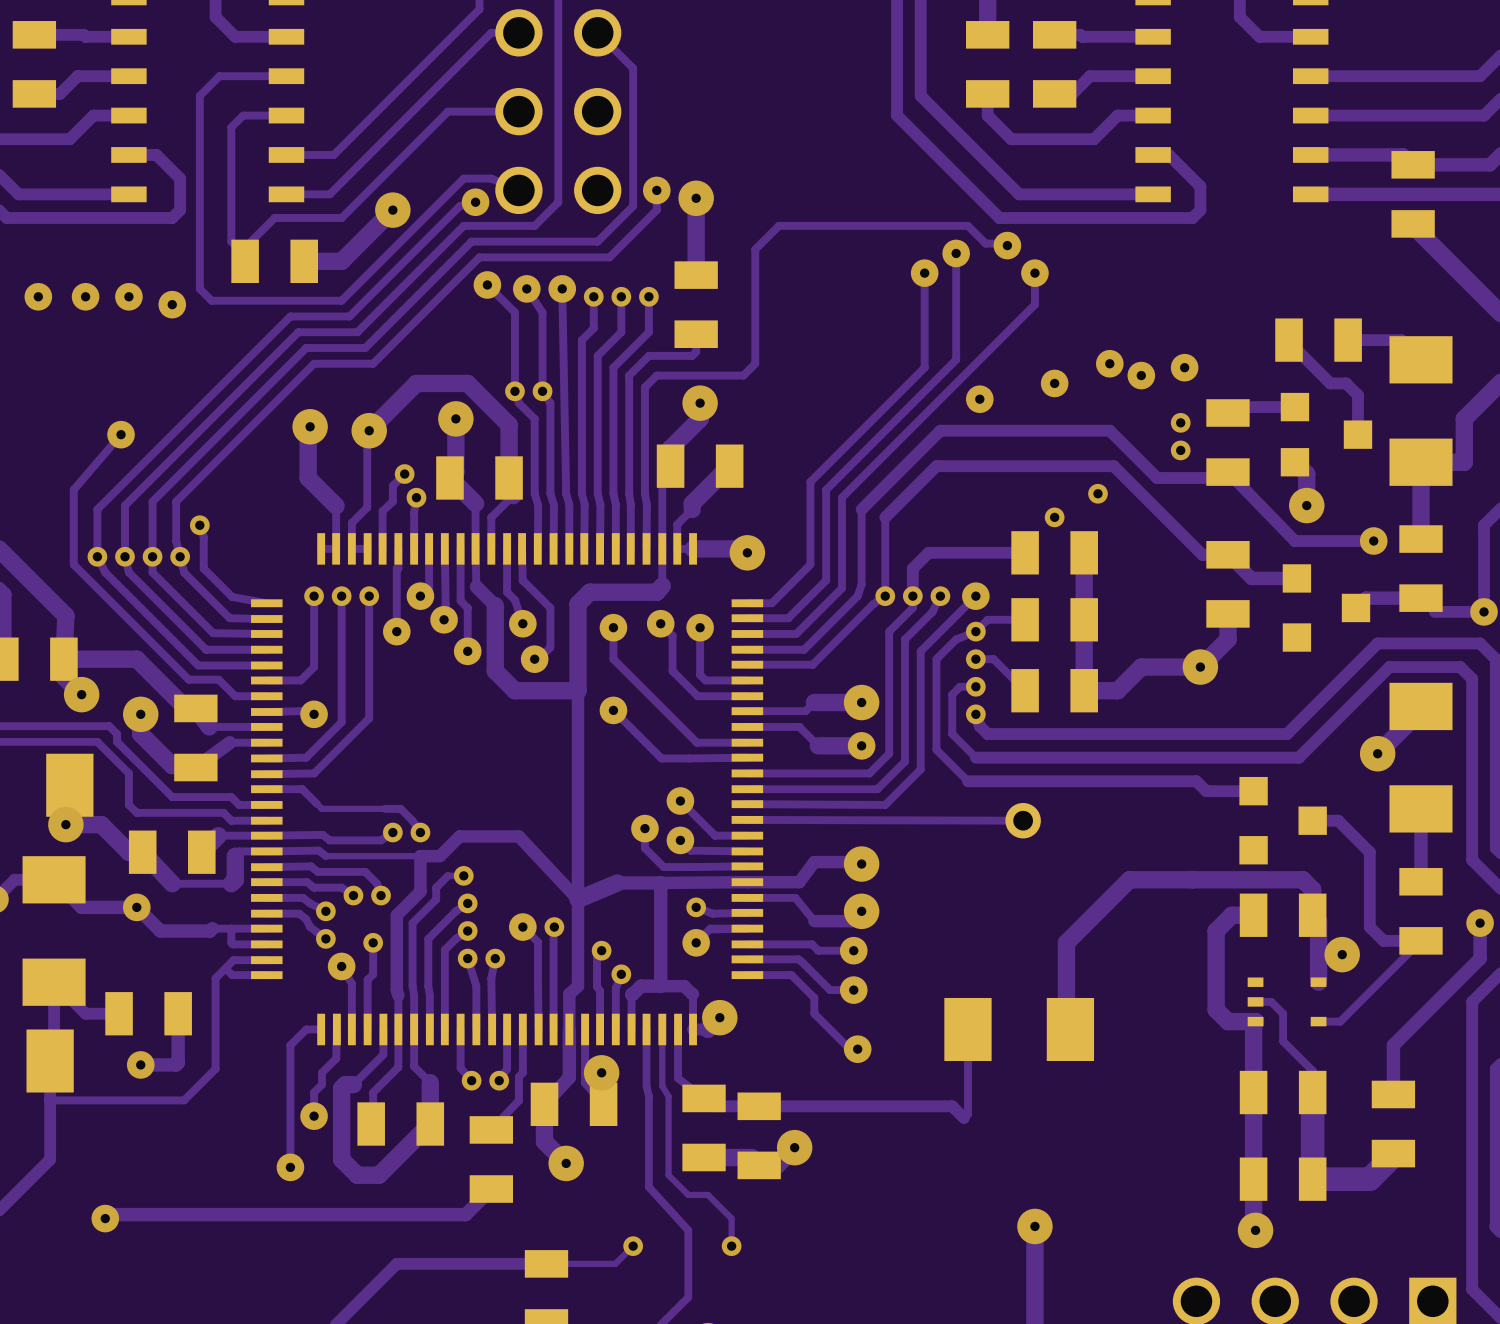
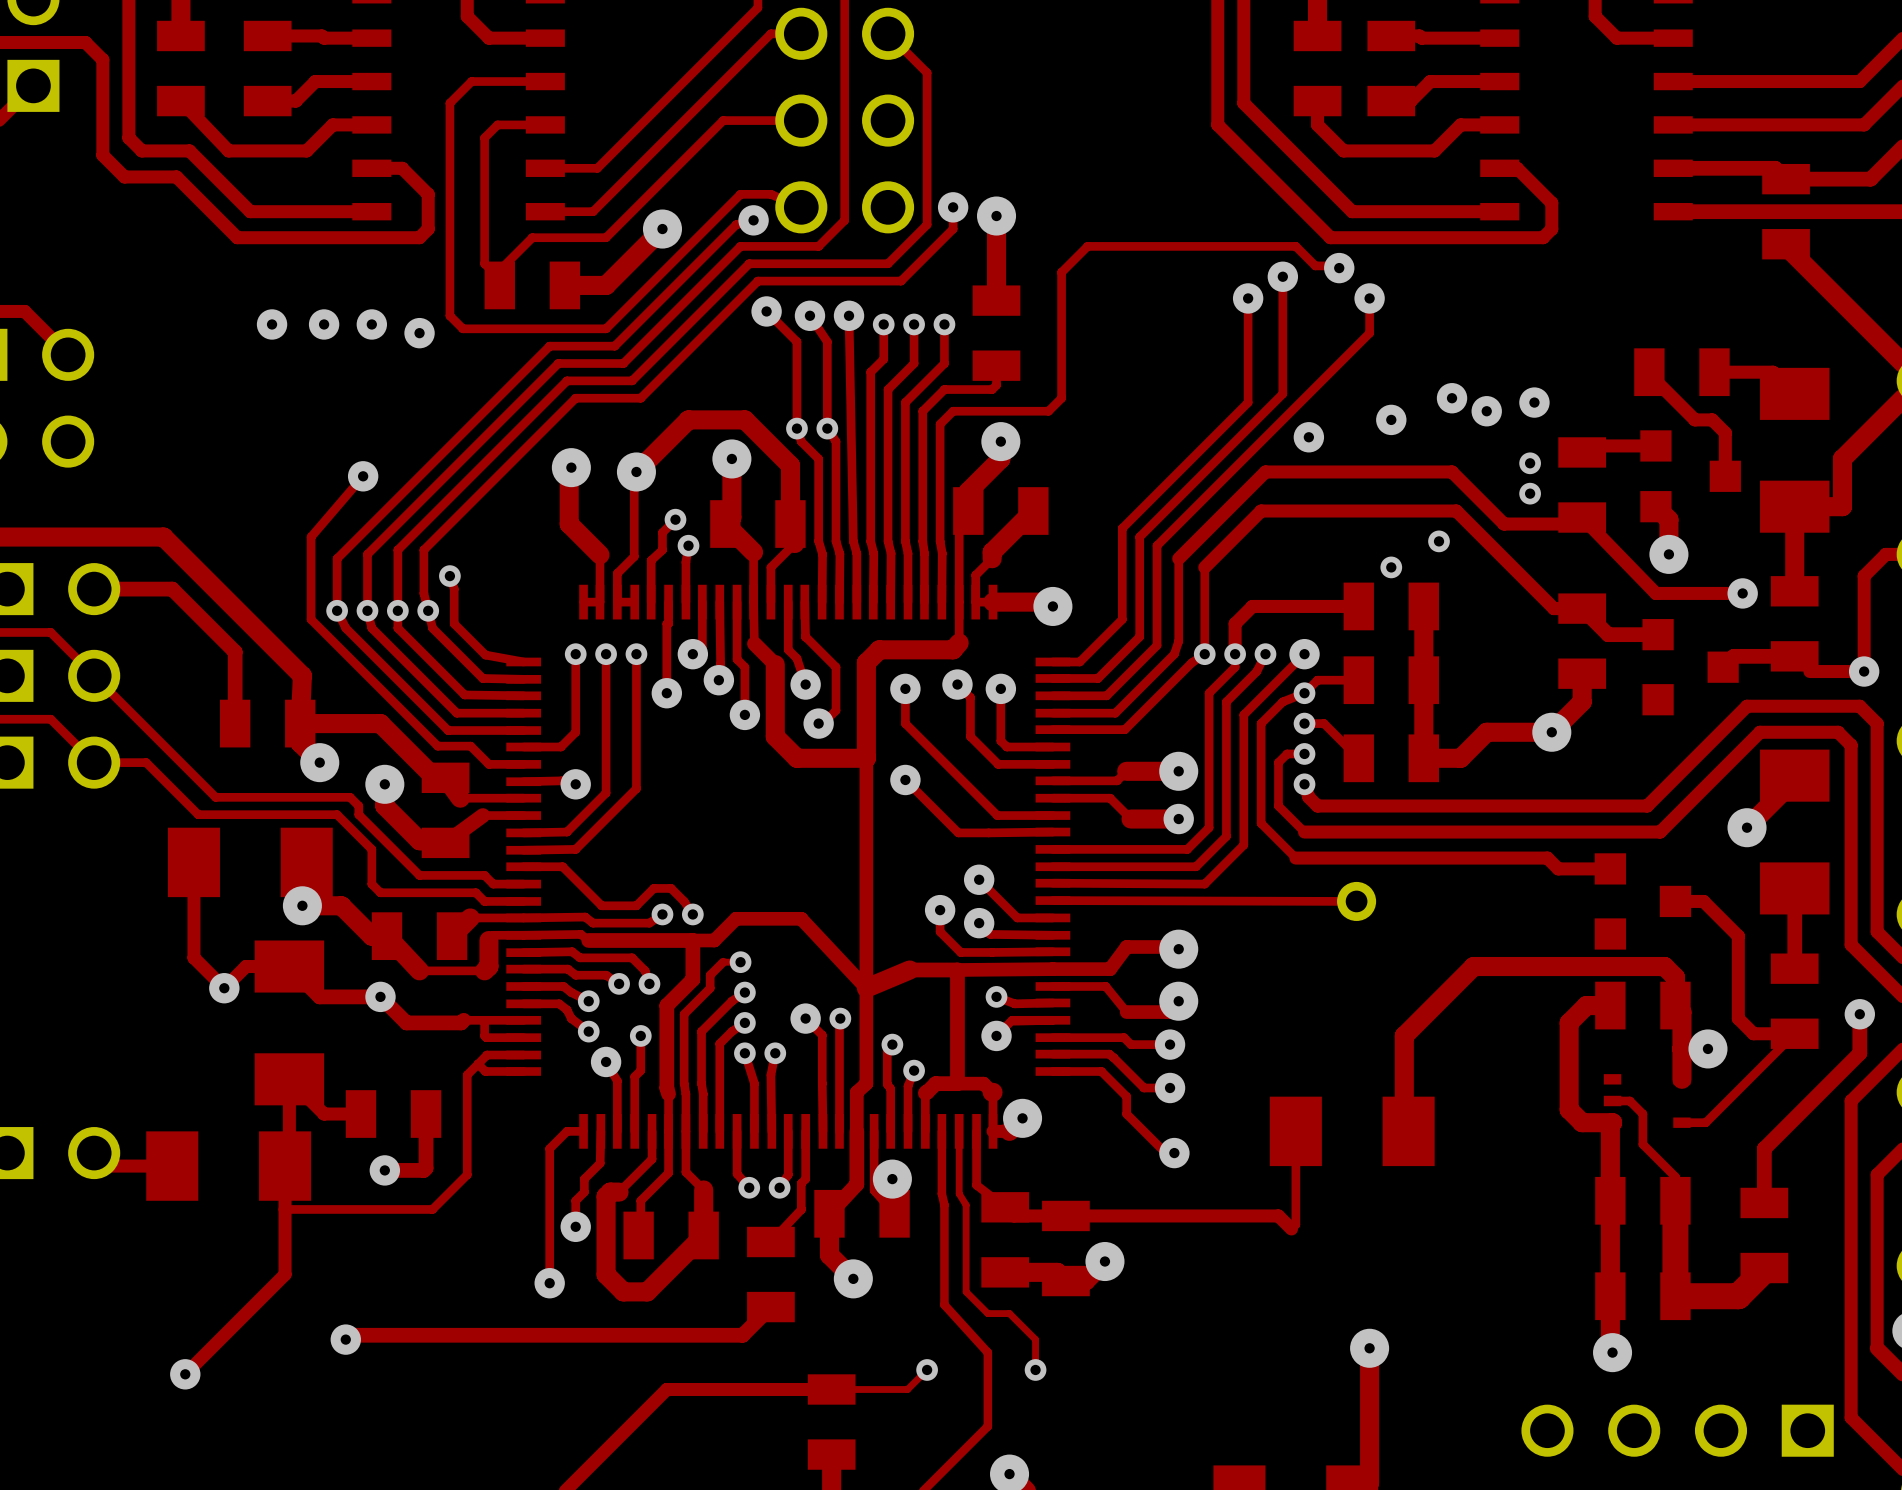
track: (316, 803) (321, 808) (385, 808) -> (578, 882) (601, 905) (636, 905) (653, 888)
track width: thin (325, 856) (420, 856) (420, 891) (396, 915) (398, 995) -> thick (588, 940) (692, 940) (692, 979) (666, 1005) (666, 1087) (668, 1094)

